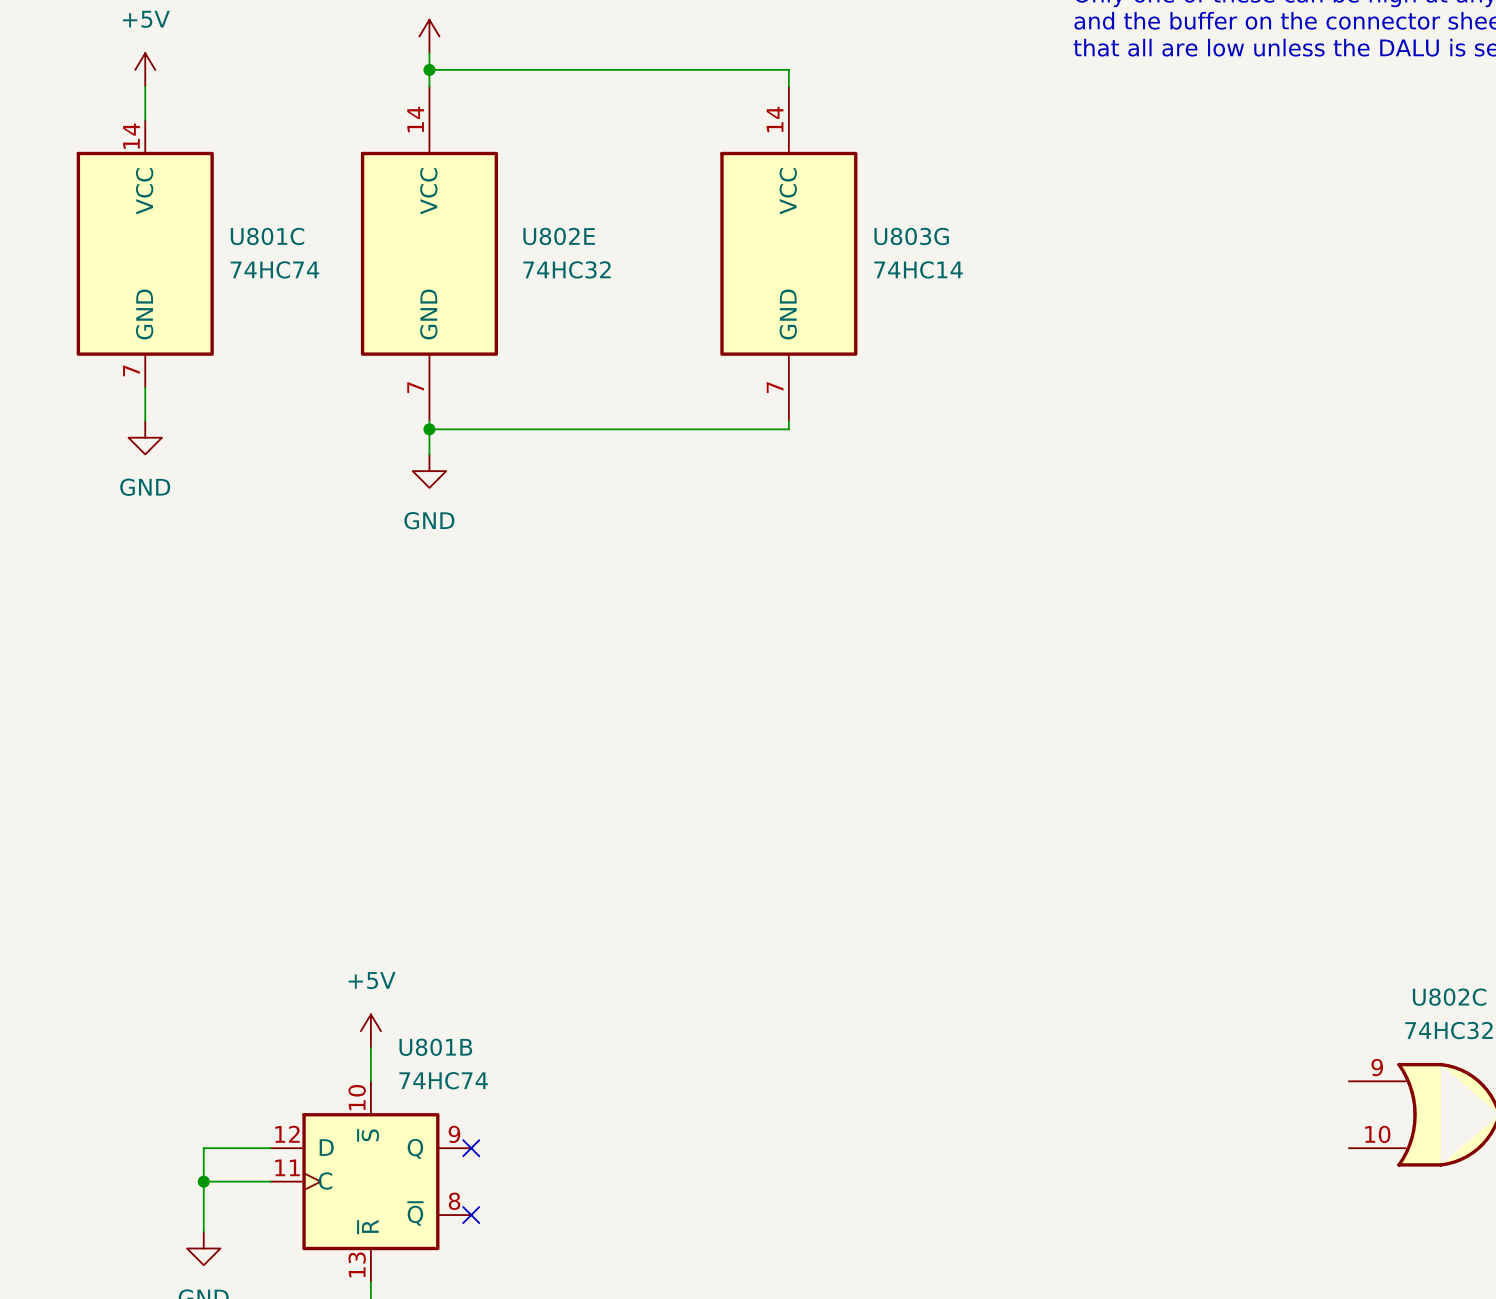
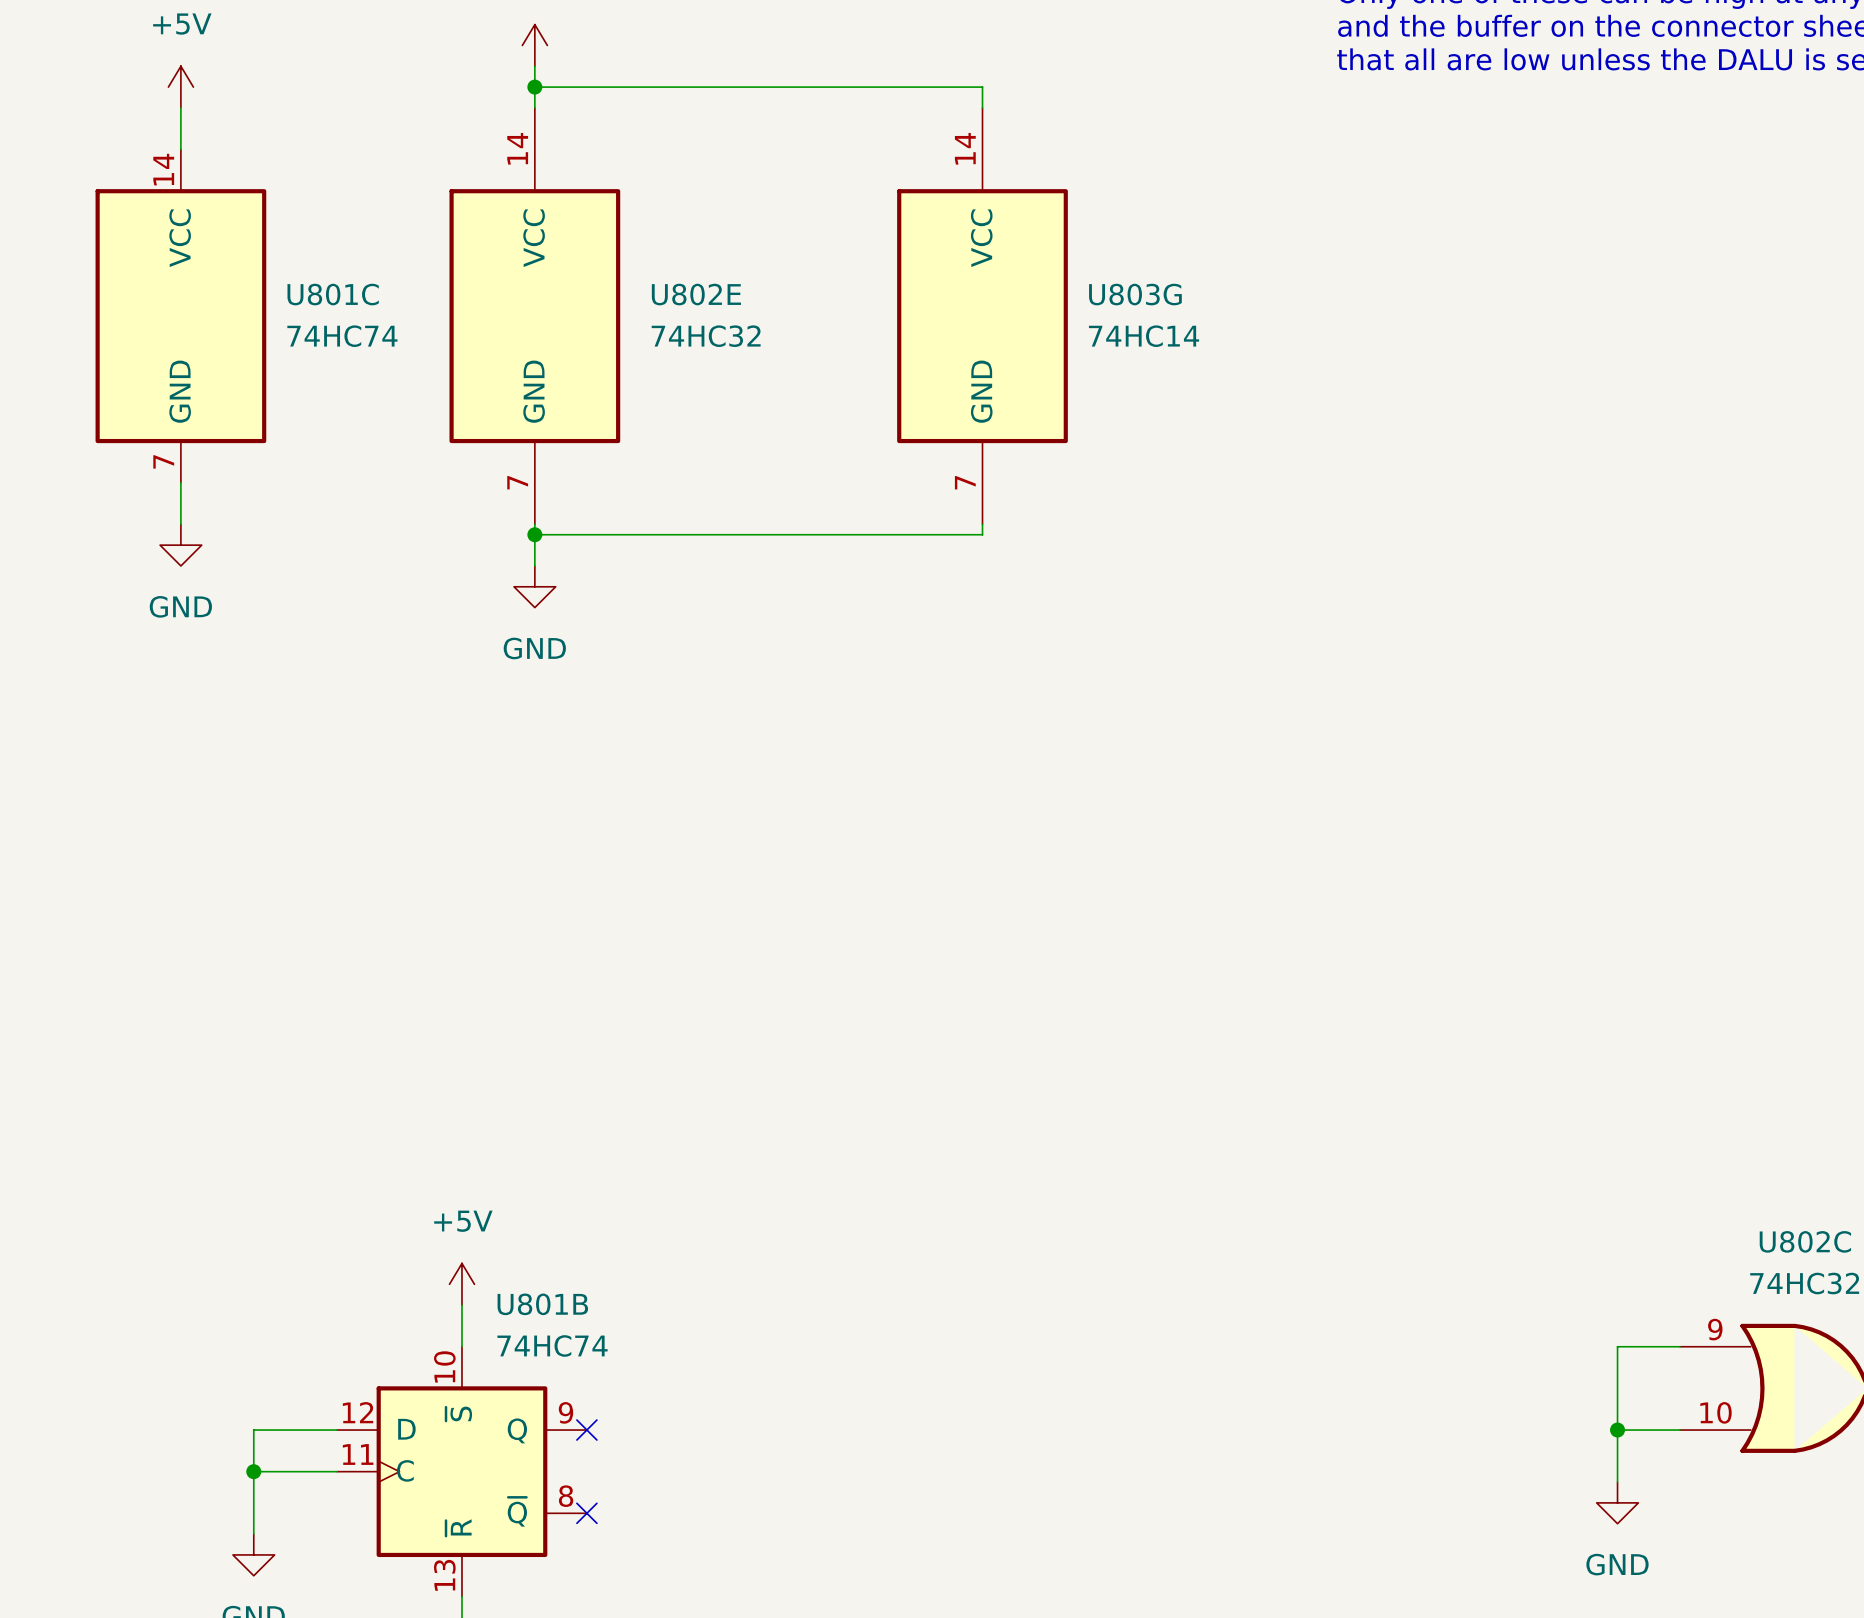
wire: none -> (1679, 1346) (1617, 1346) (1617, 1482)
wire: none -> (1617, 1430) (1679, 1430)
junction: none -> (1617, 1430)
power symbol: none -> GND (1617, 1502)

